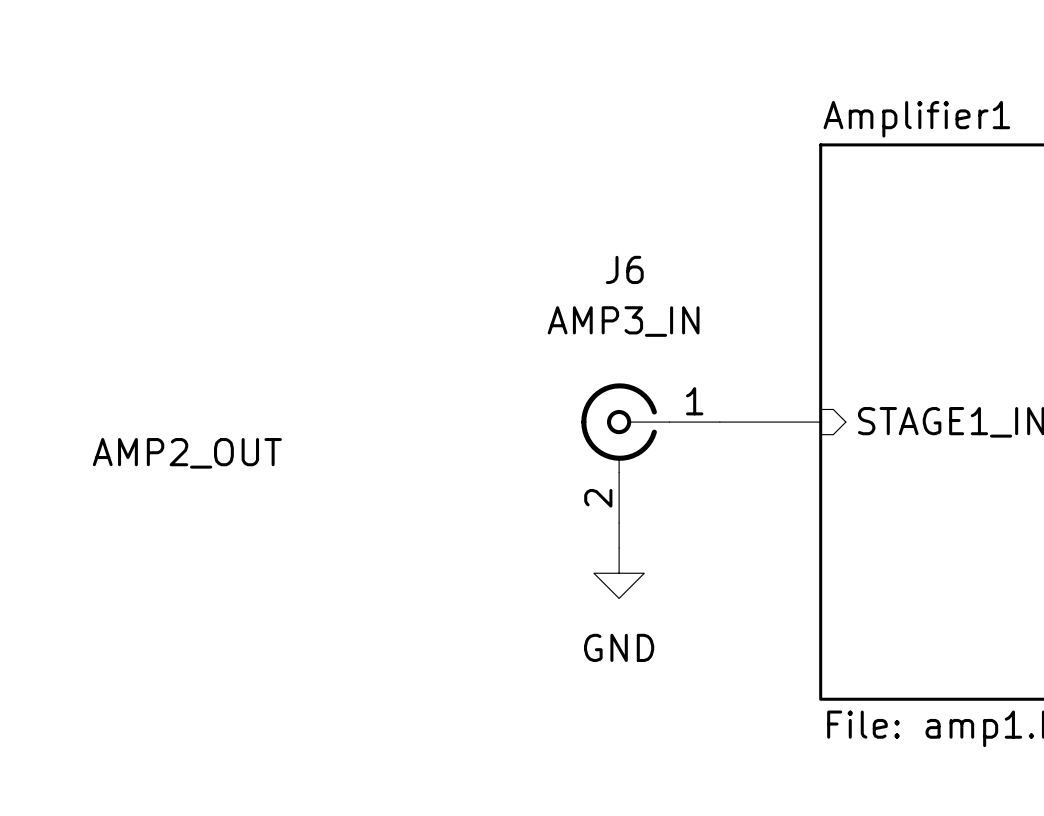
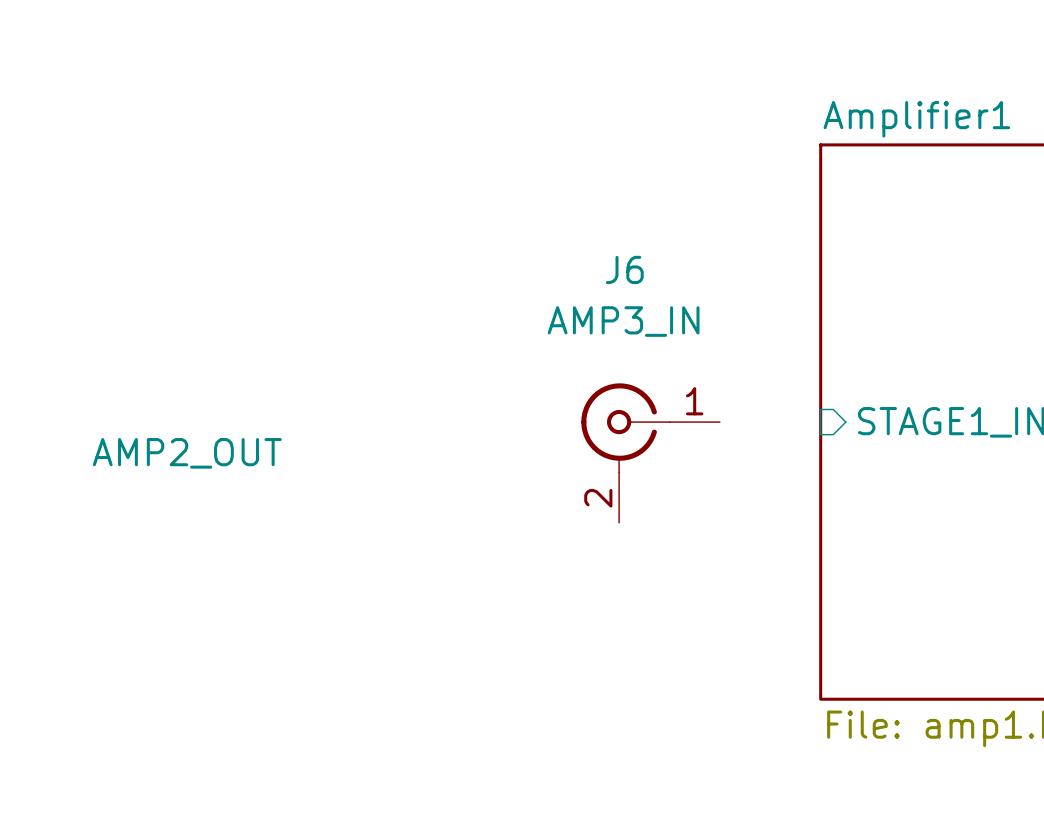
wire: (719, 422) (820, 422) -> none
wire: (619, 522) (619, 548) -> none
power symbol: GND (619, 573) -> none

